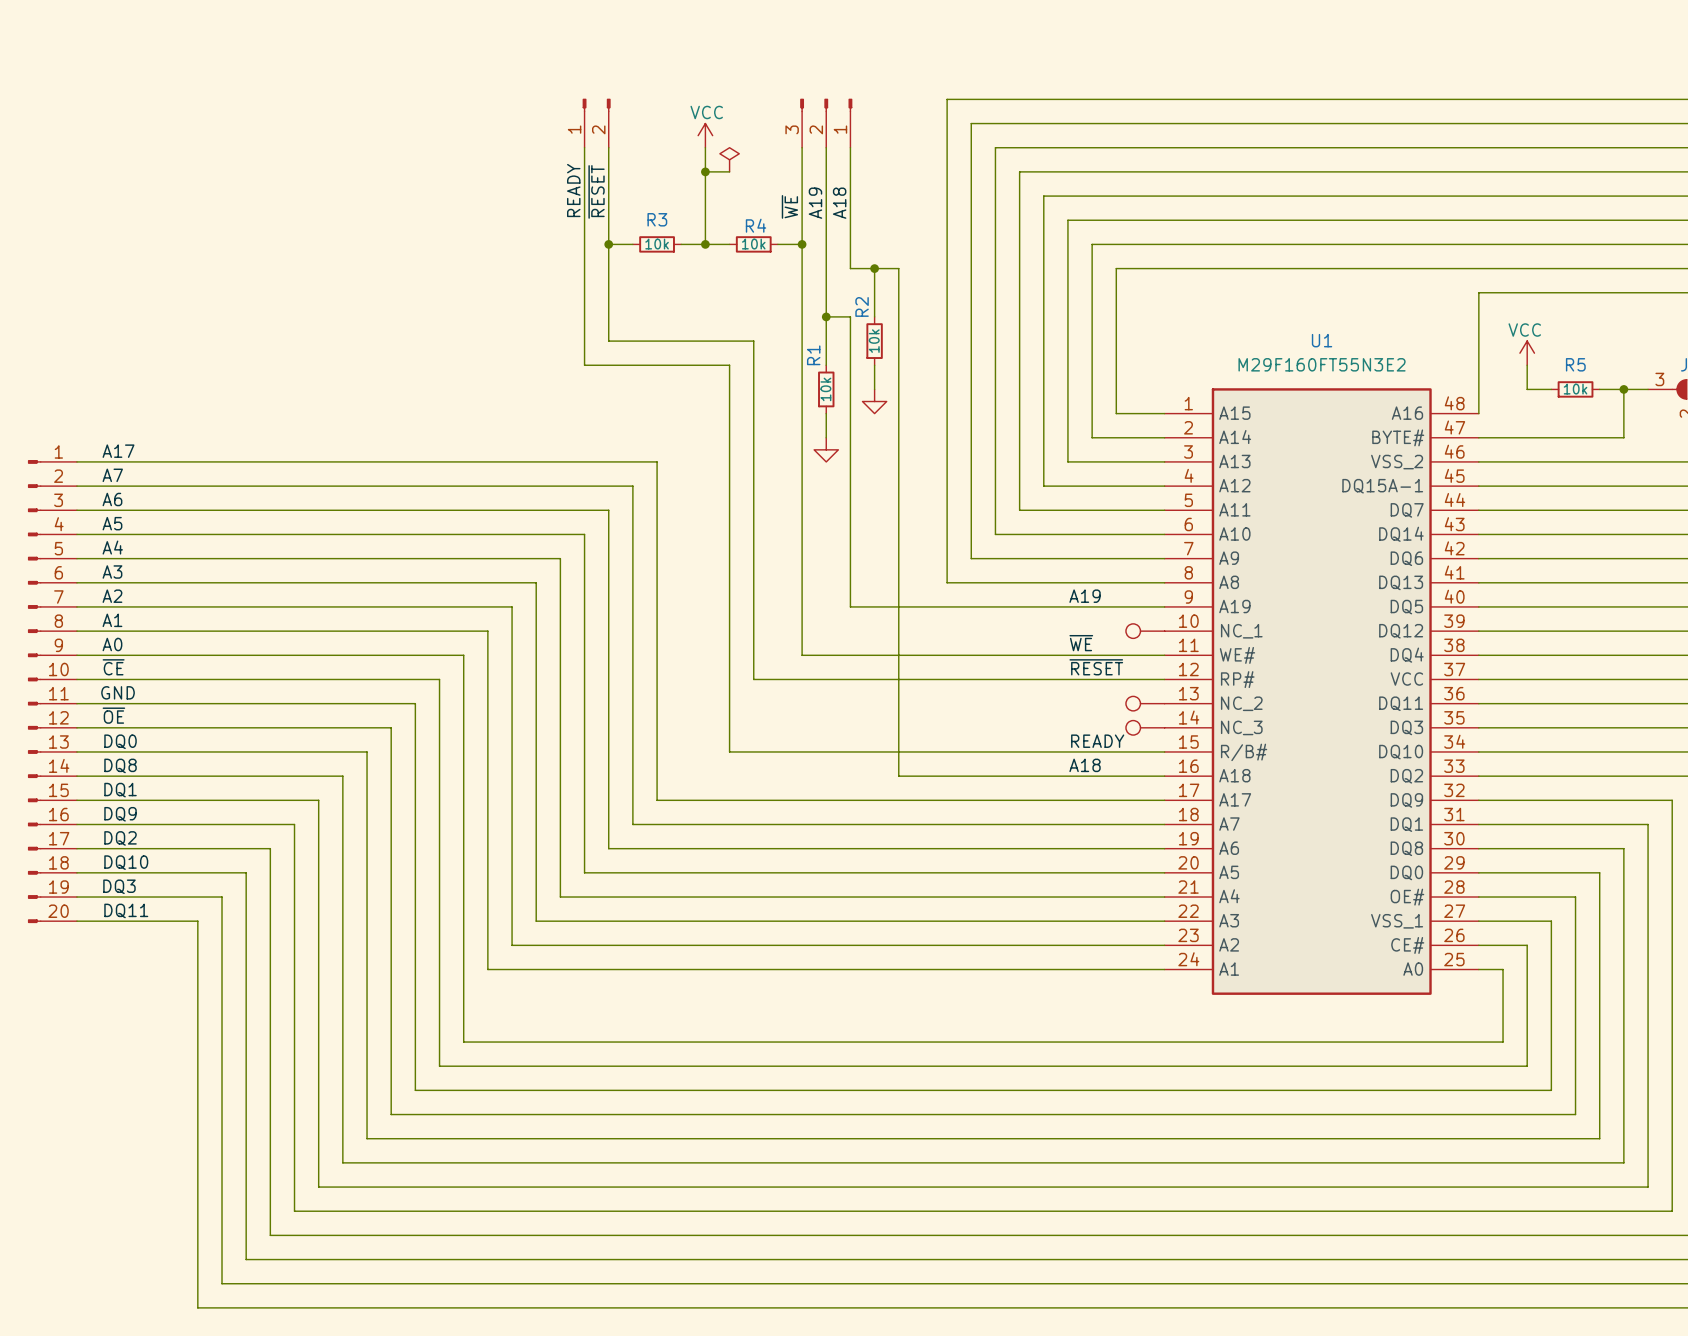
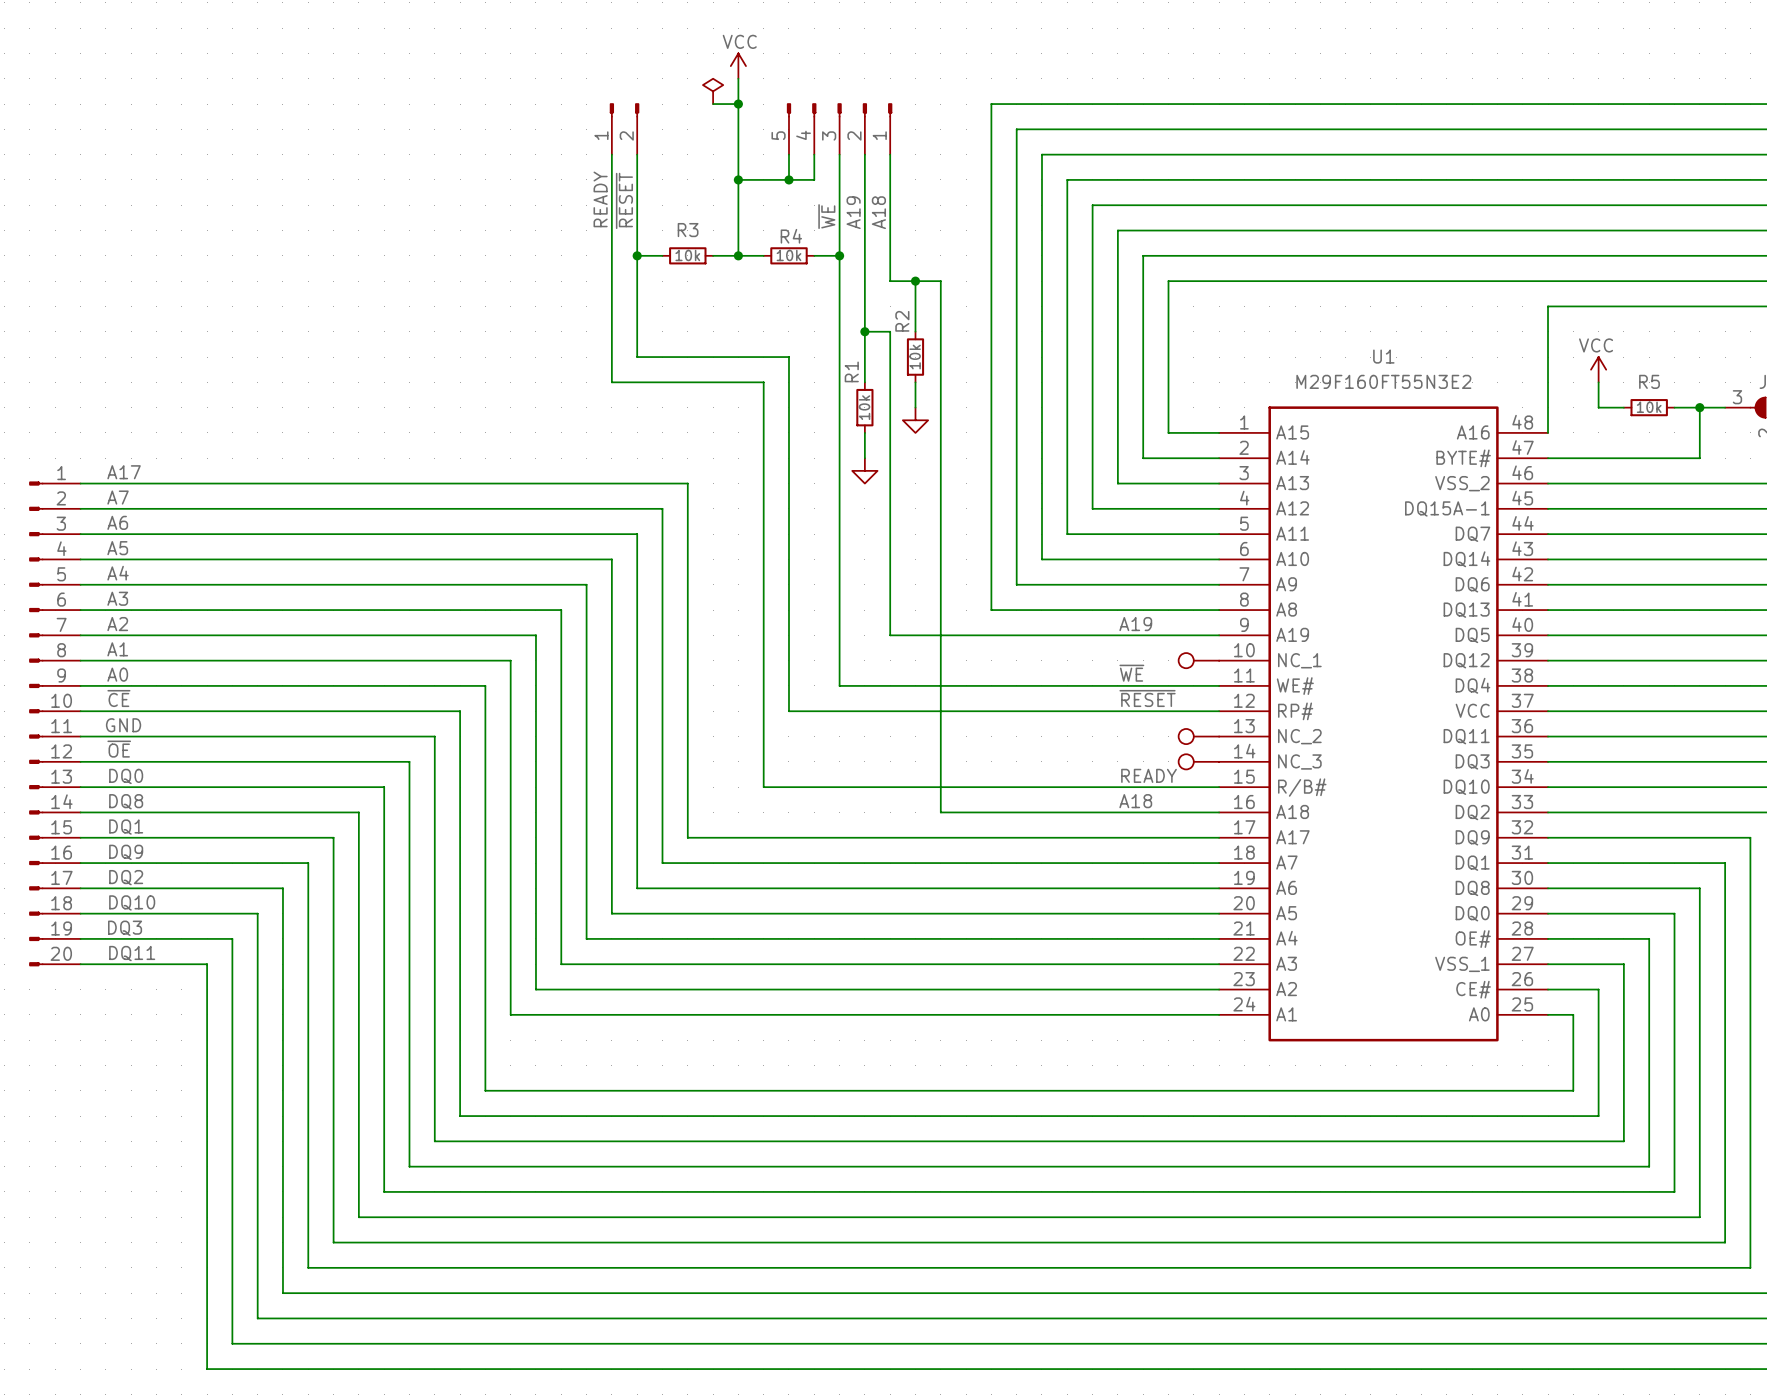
wire: none -> (738, 78) (738, 154)
wire: none -> (713, 104) (738, 104)
junction: none -> (738, 104)
part: none -> (839, 128)
power symbol position: VCC (705, 135) -> VCC (738, 66)
wire: none -> (788, 154) (788, 179)
wire: none -> (814, 154) (814, 179) (763, 179)
power symbol position: (729, 159) -> (713, 91)
junction: none -> (788, 179)

